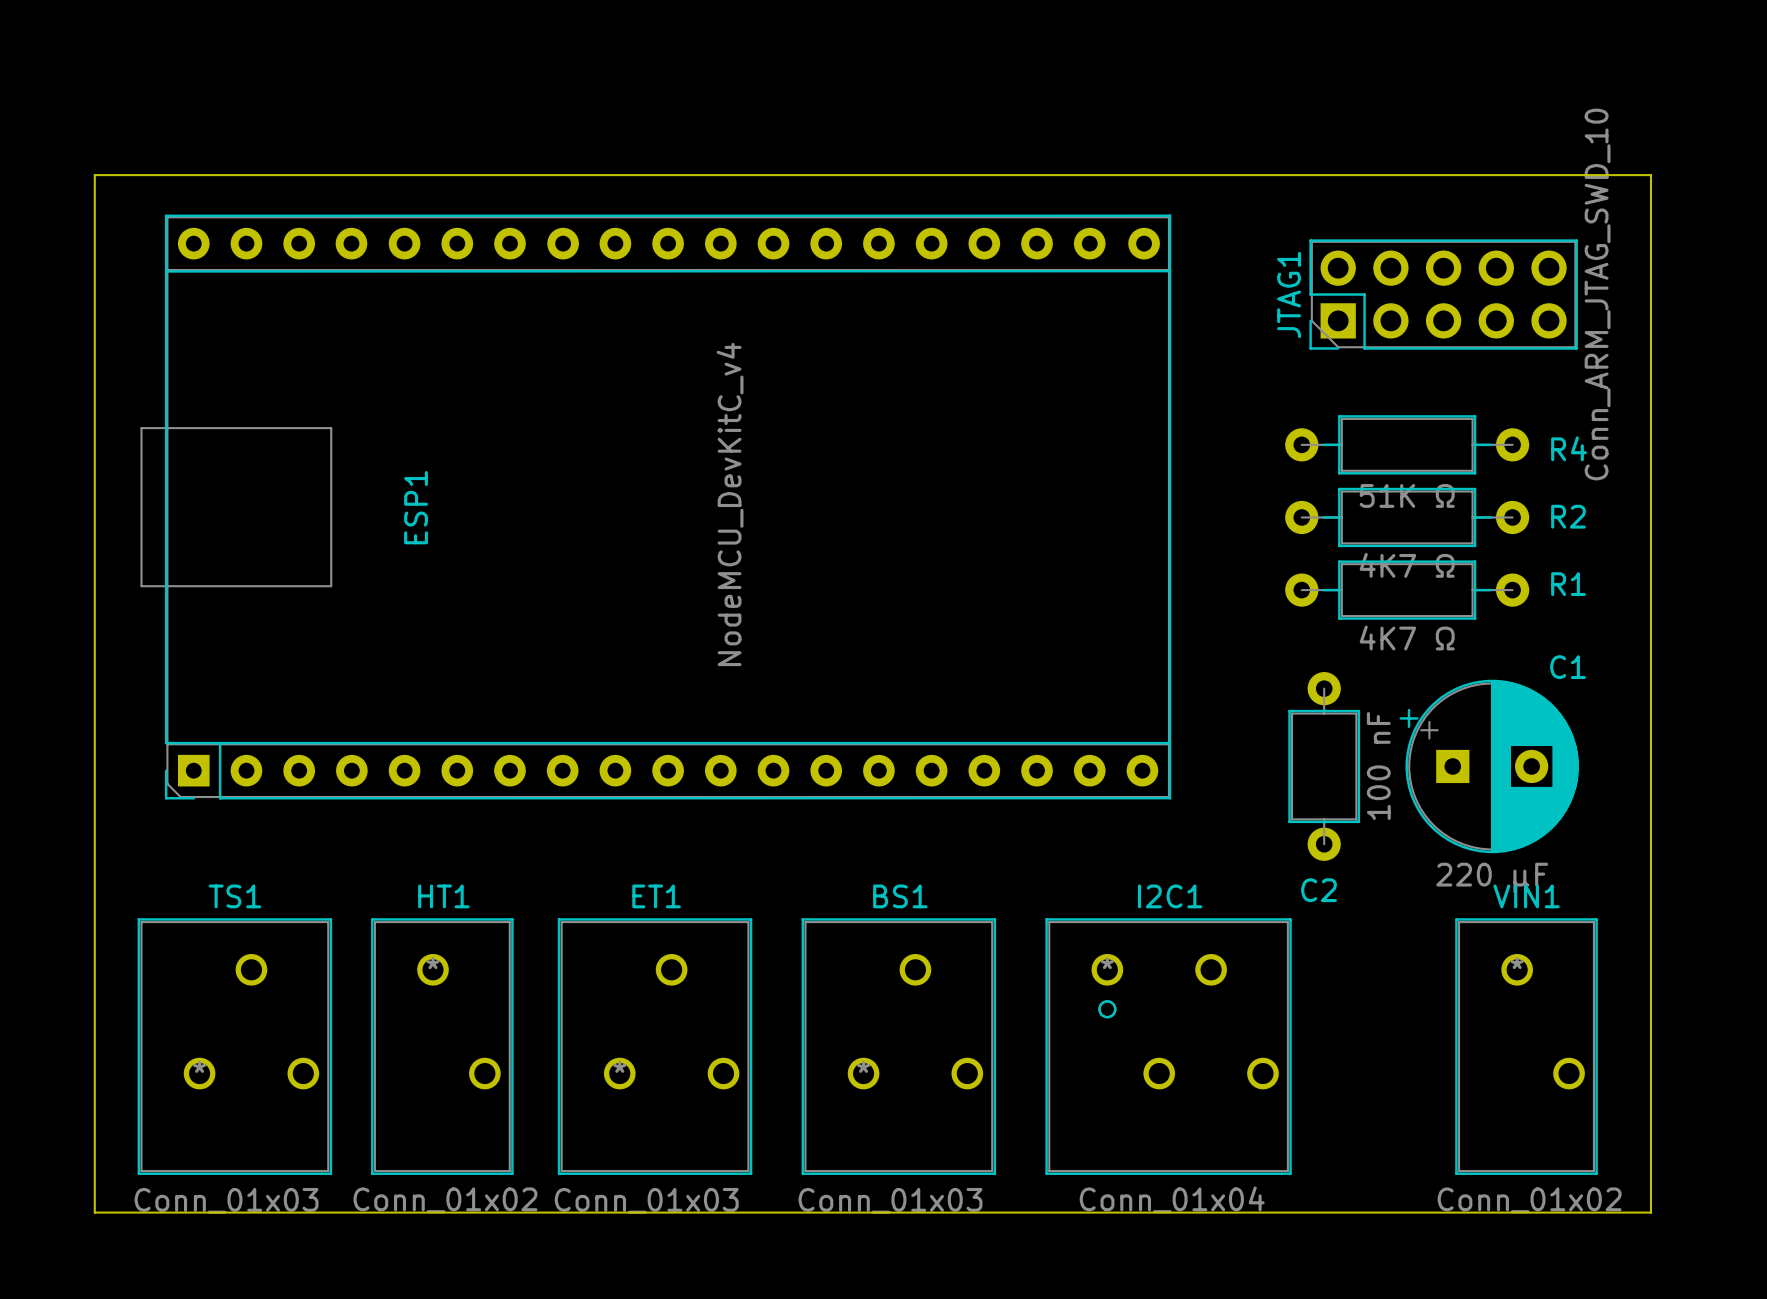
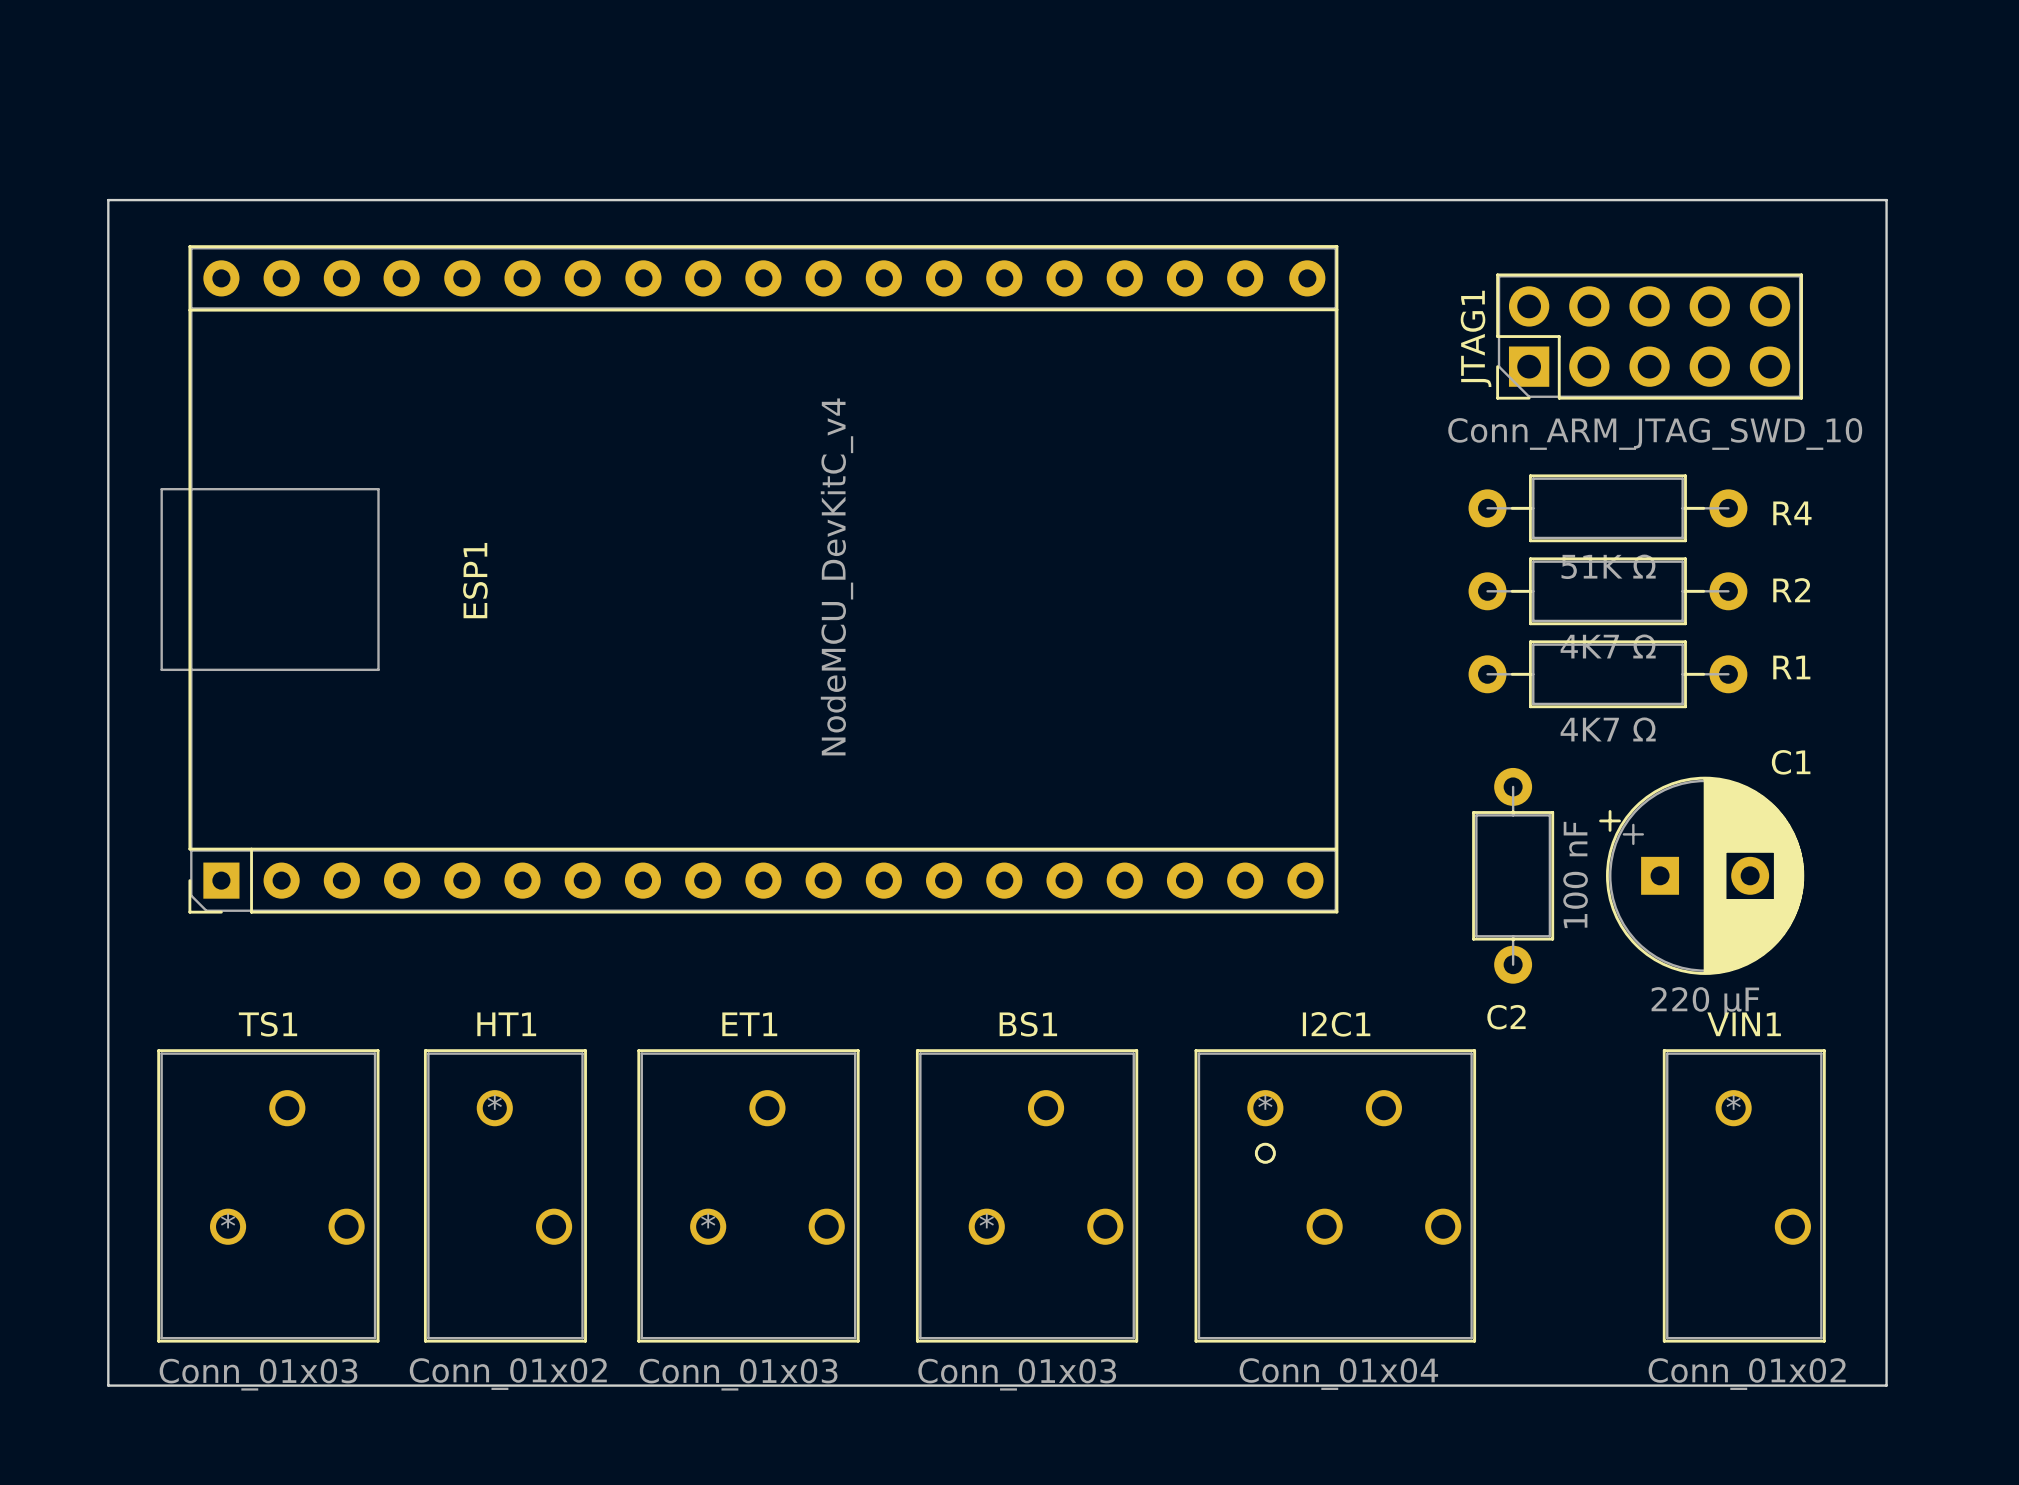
JTAG1 value rotation: 0° (1597, 294) -> 90° clockwise (1655, 433)

